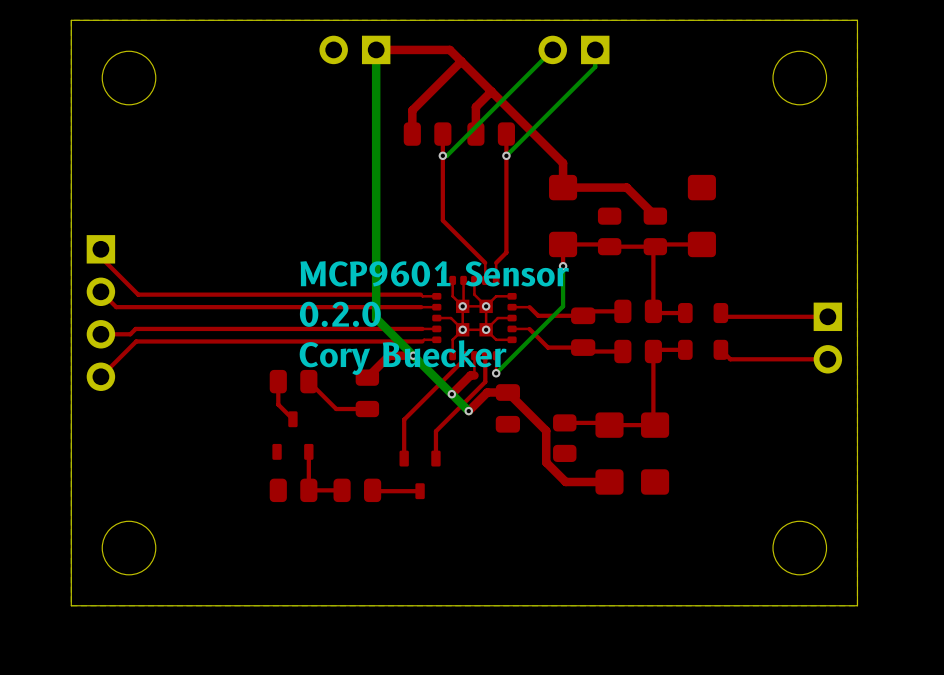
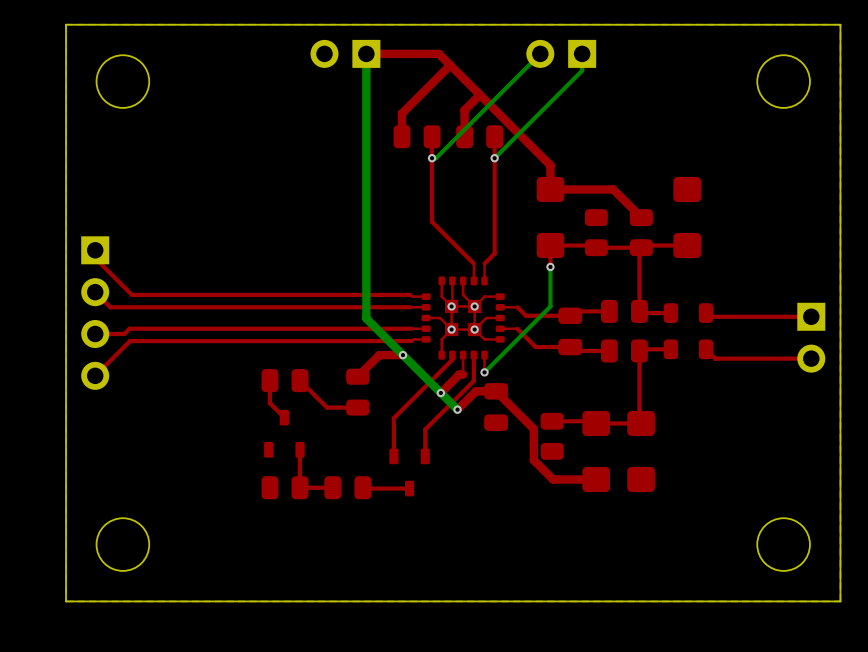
text: MCP9601 Sensor (434, 273) -> none
text: 0.2.0 (340, 314) -> none
text: Cory Buecker (403, 357) -> none

